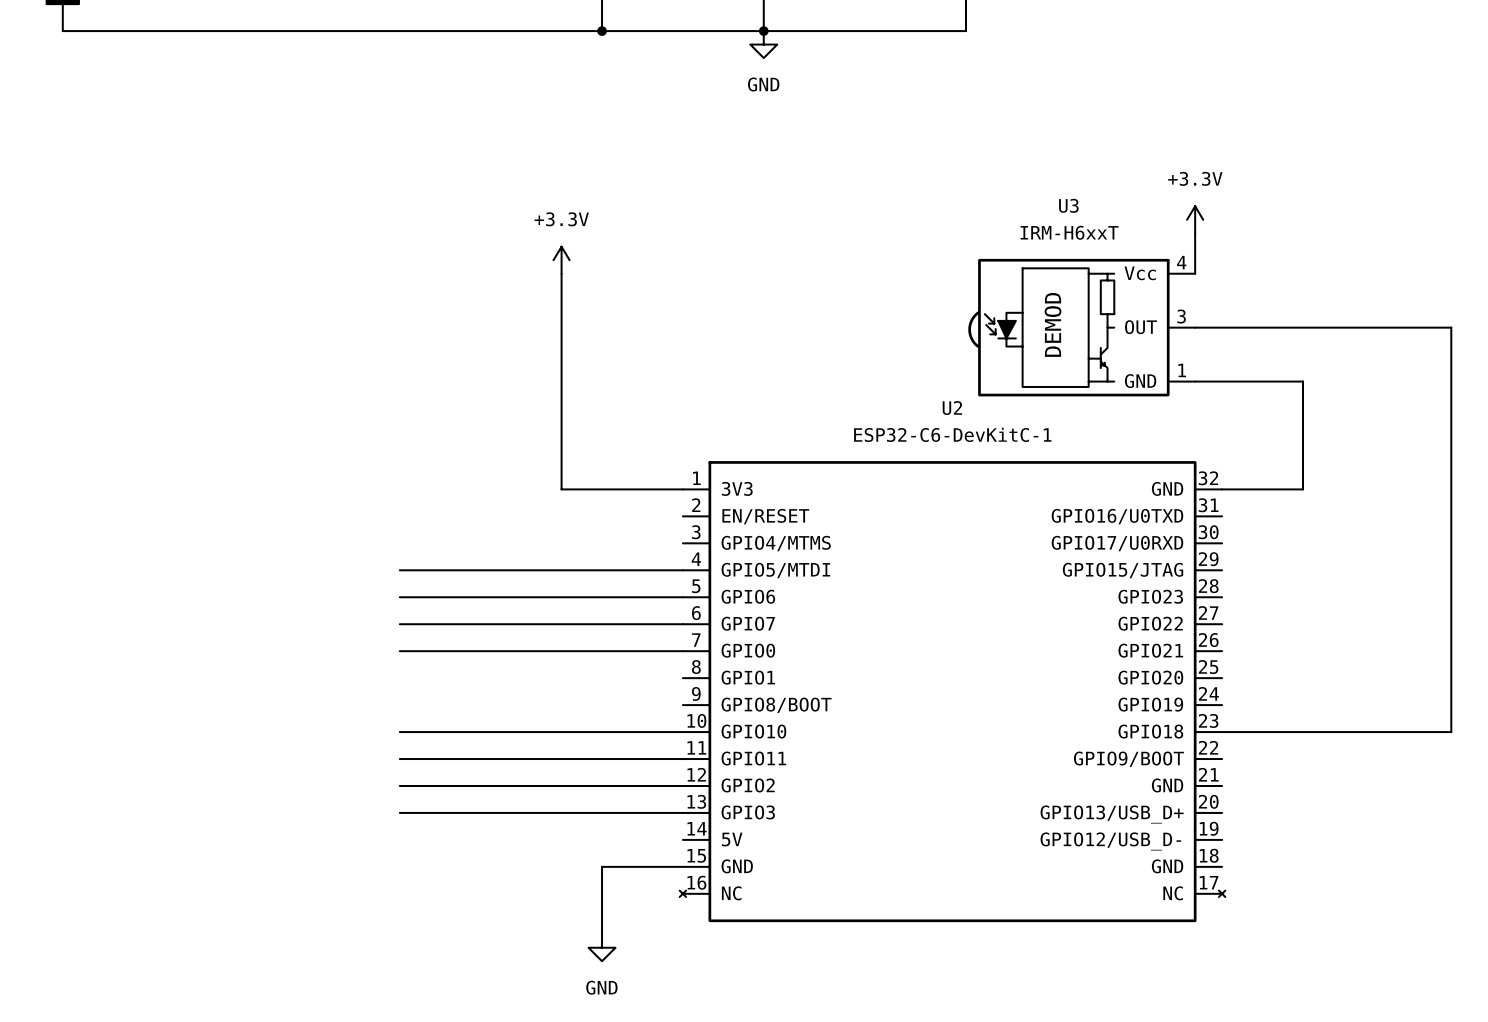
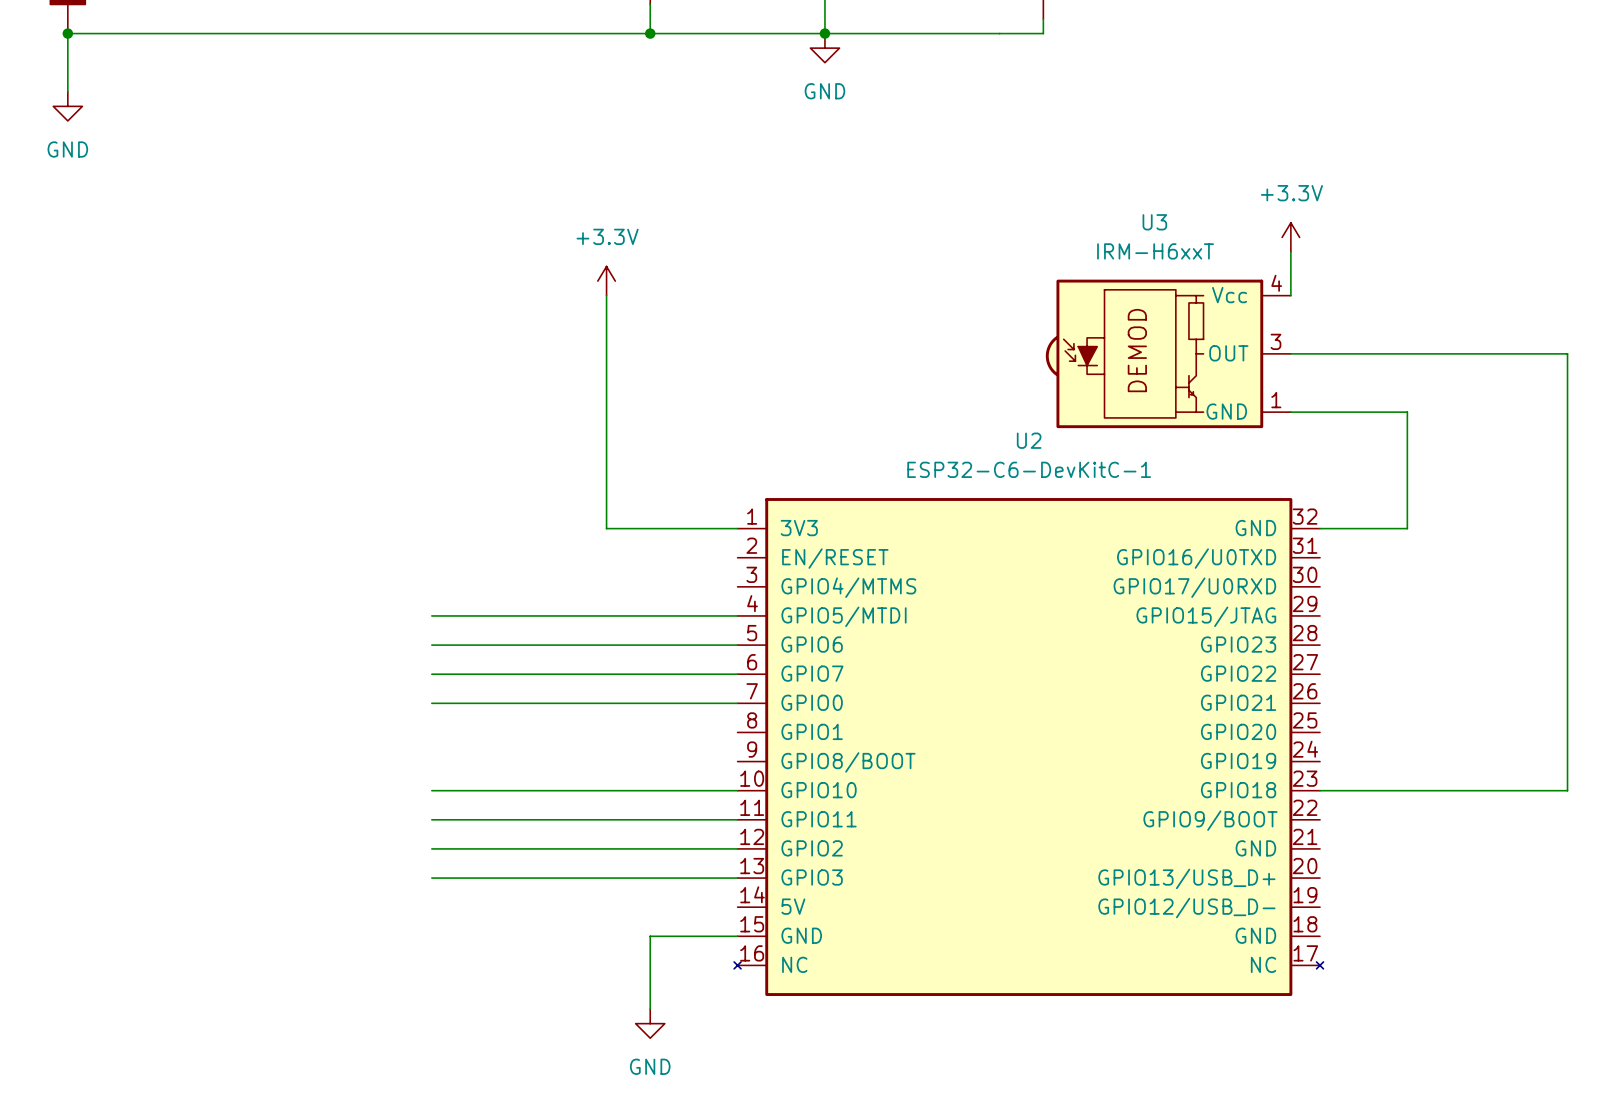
wire: none -> (67, 33) (67, 91)
junction: none -> (67, 33)
power symbol: none -> GND (67, 106)

